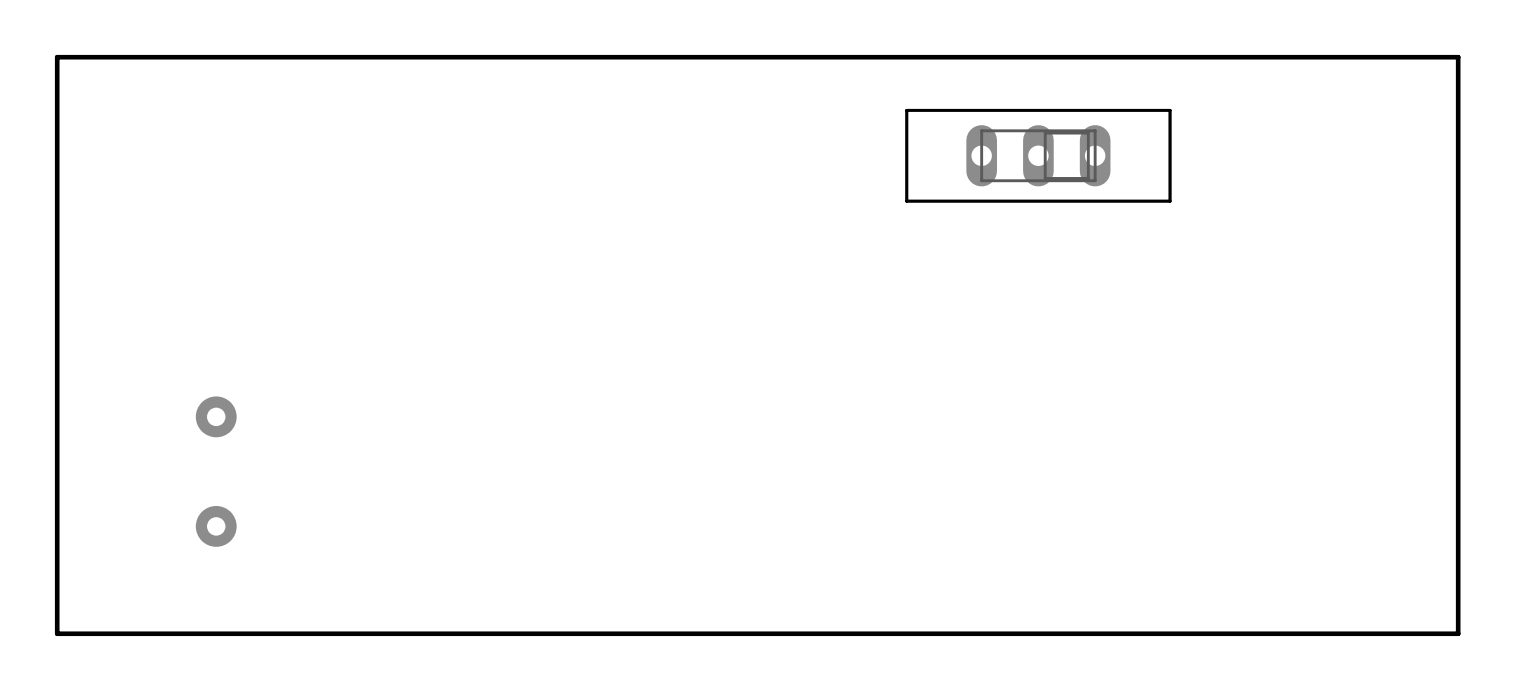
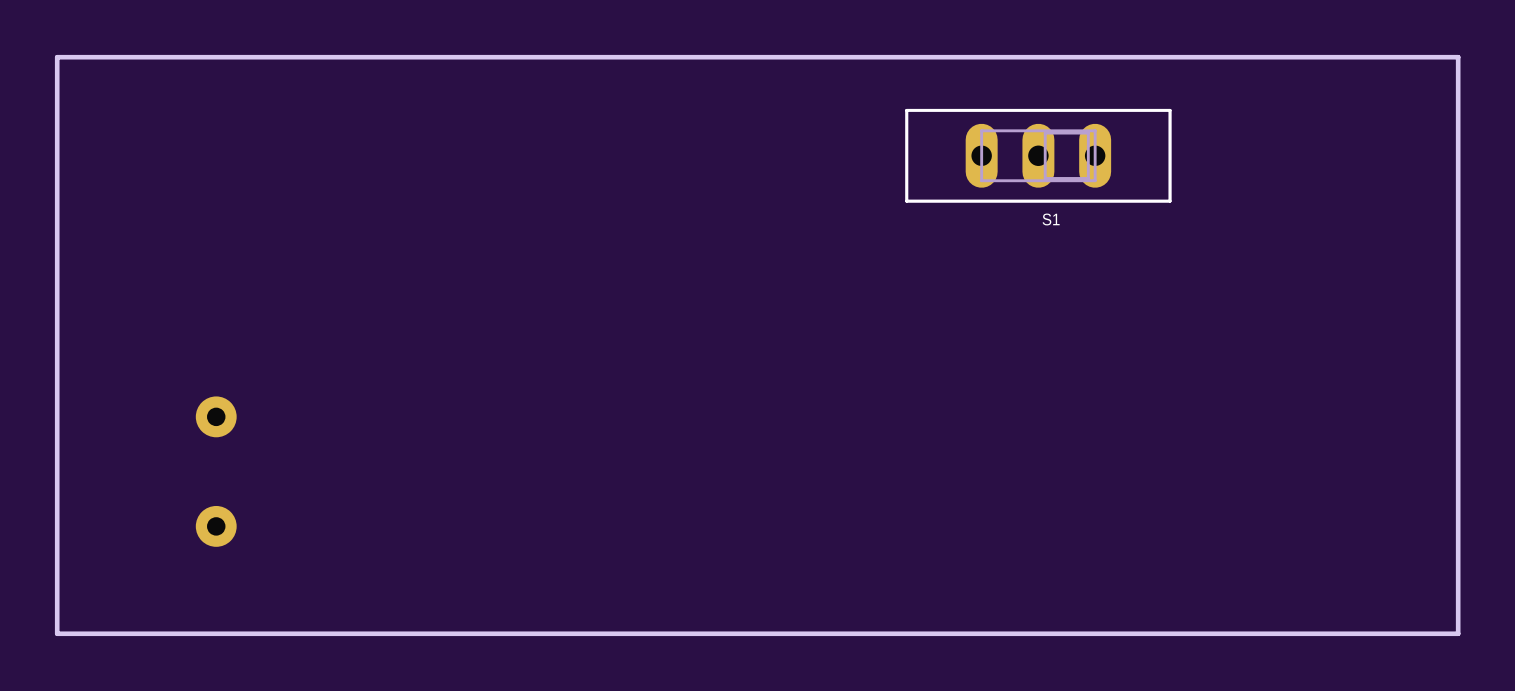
part: (1038, 155) -> none
S1: none -> (1038, 155)

